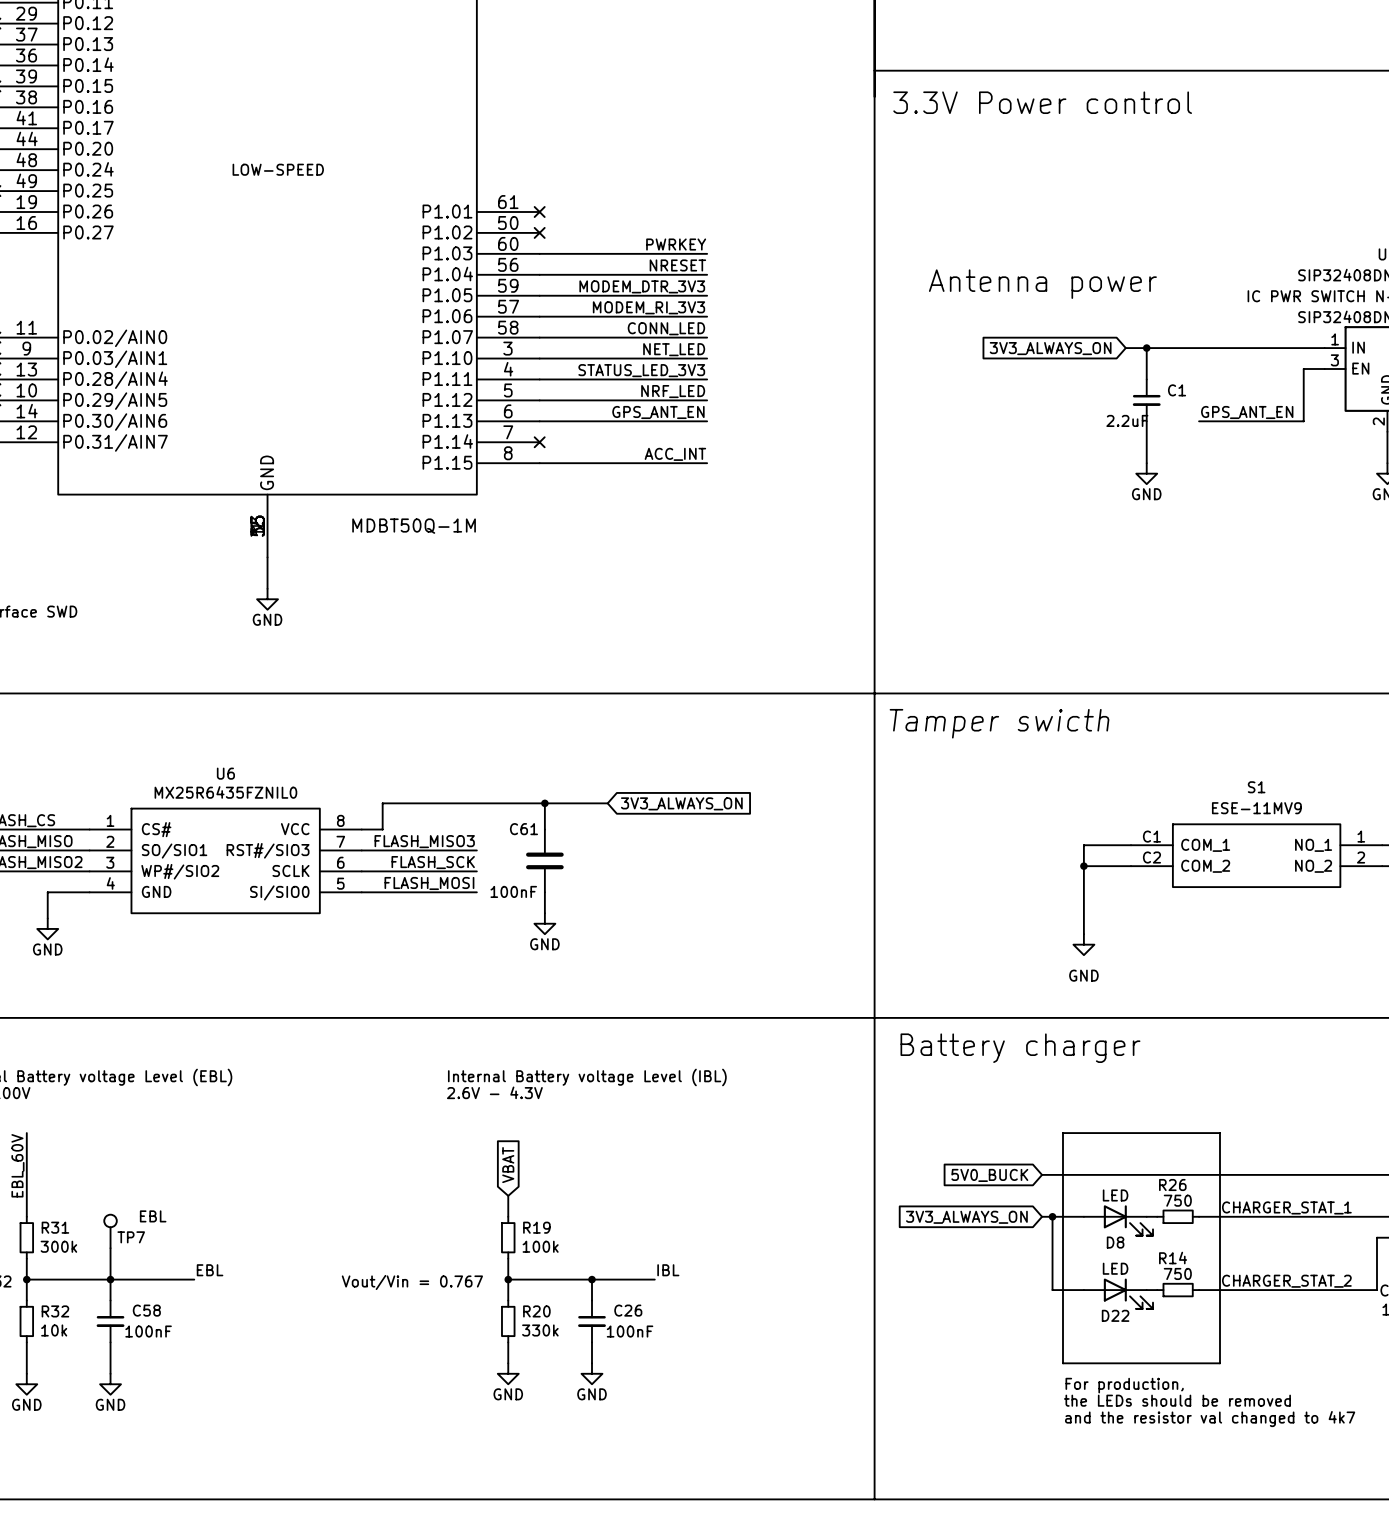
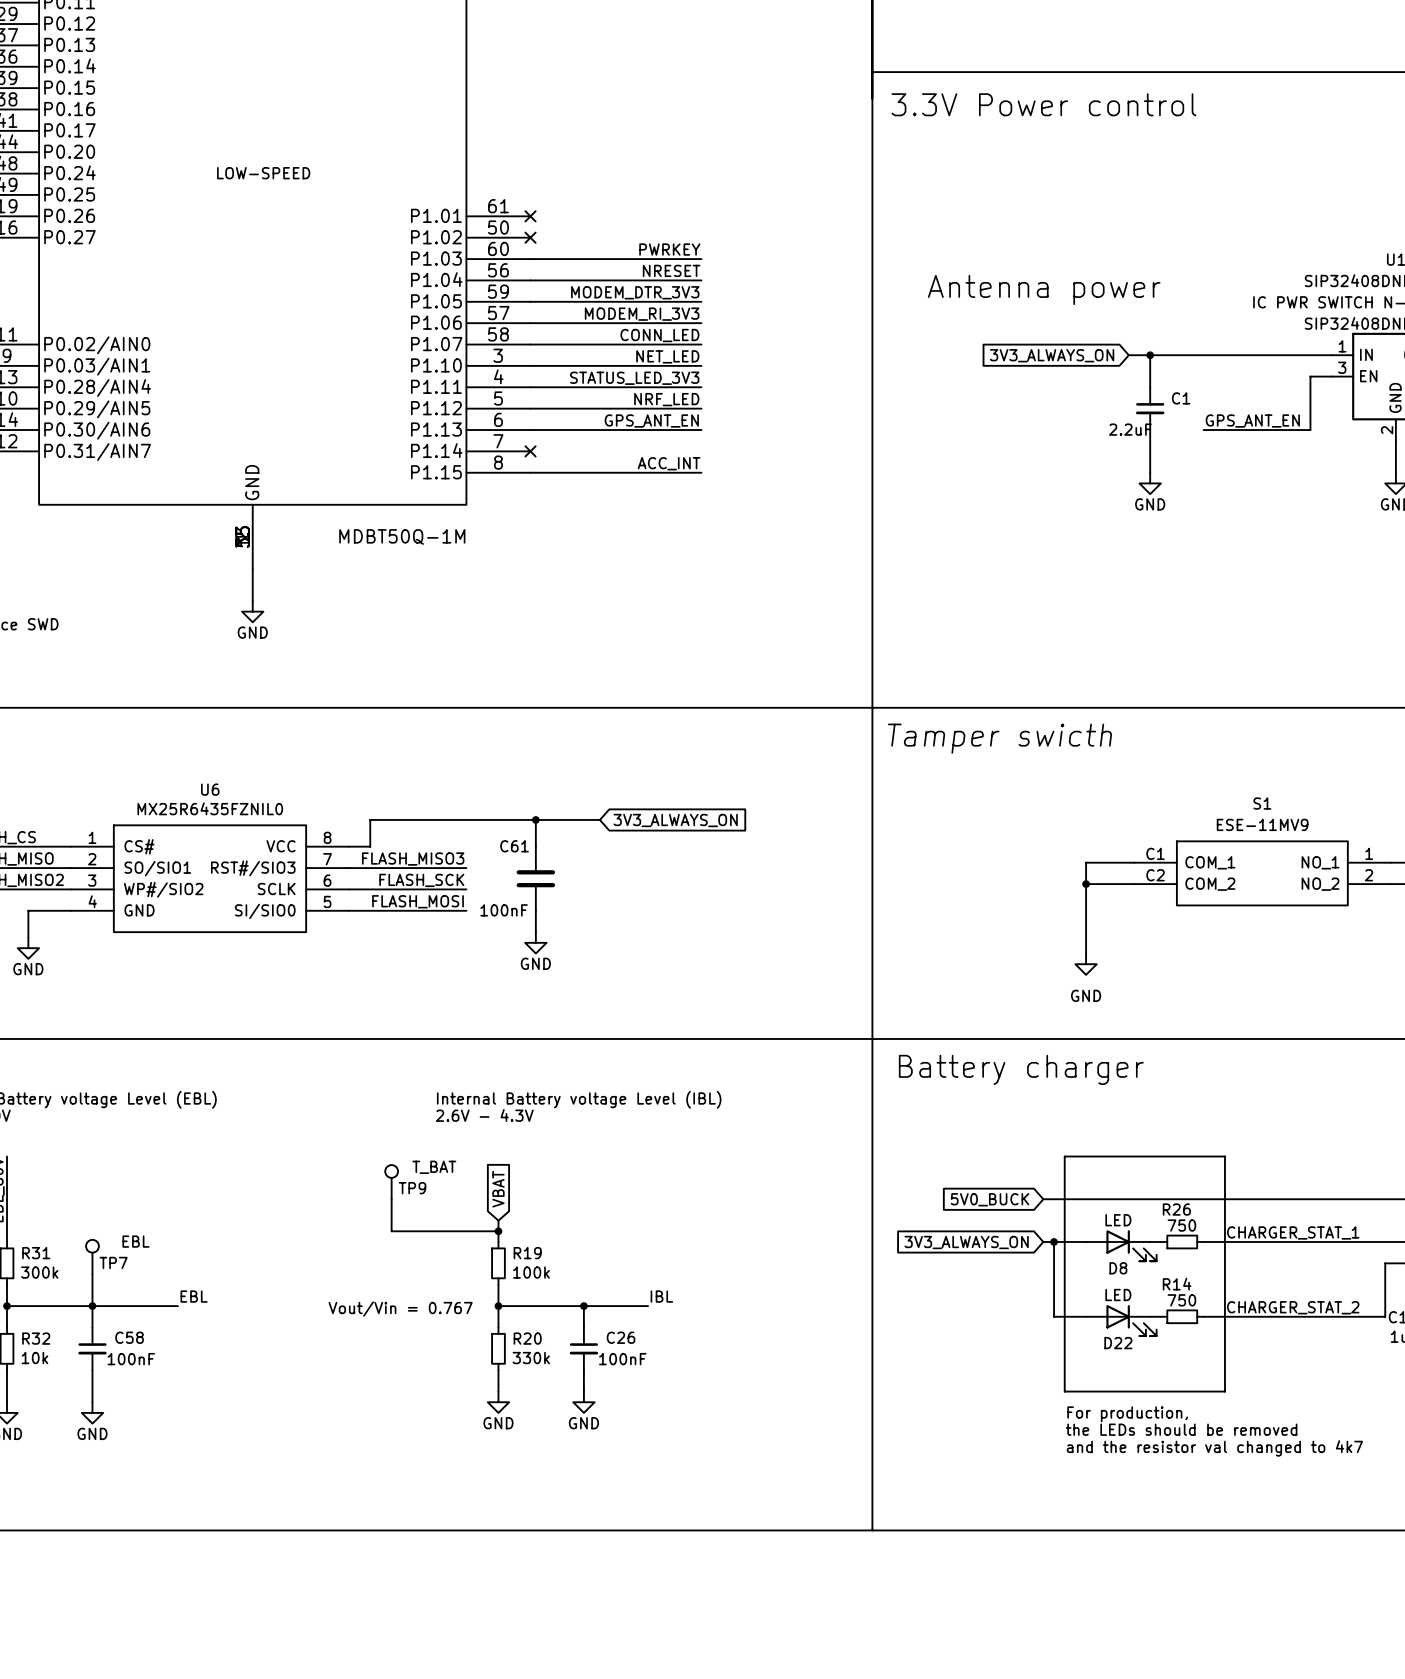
TP9: none -> T_BAT (391, 1182)
wire: none -> (391, 1199) (391, 1231) (498, 1231)
junction: none -> (498, 1231)

